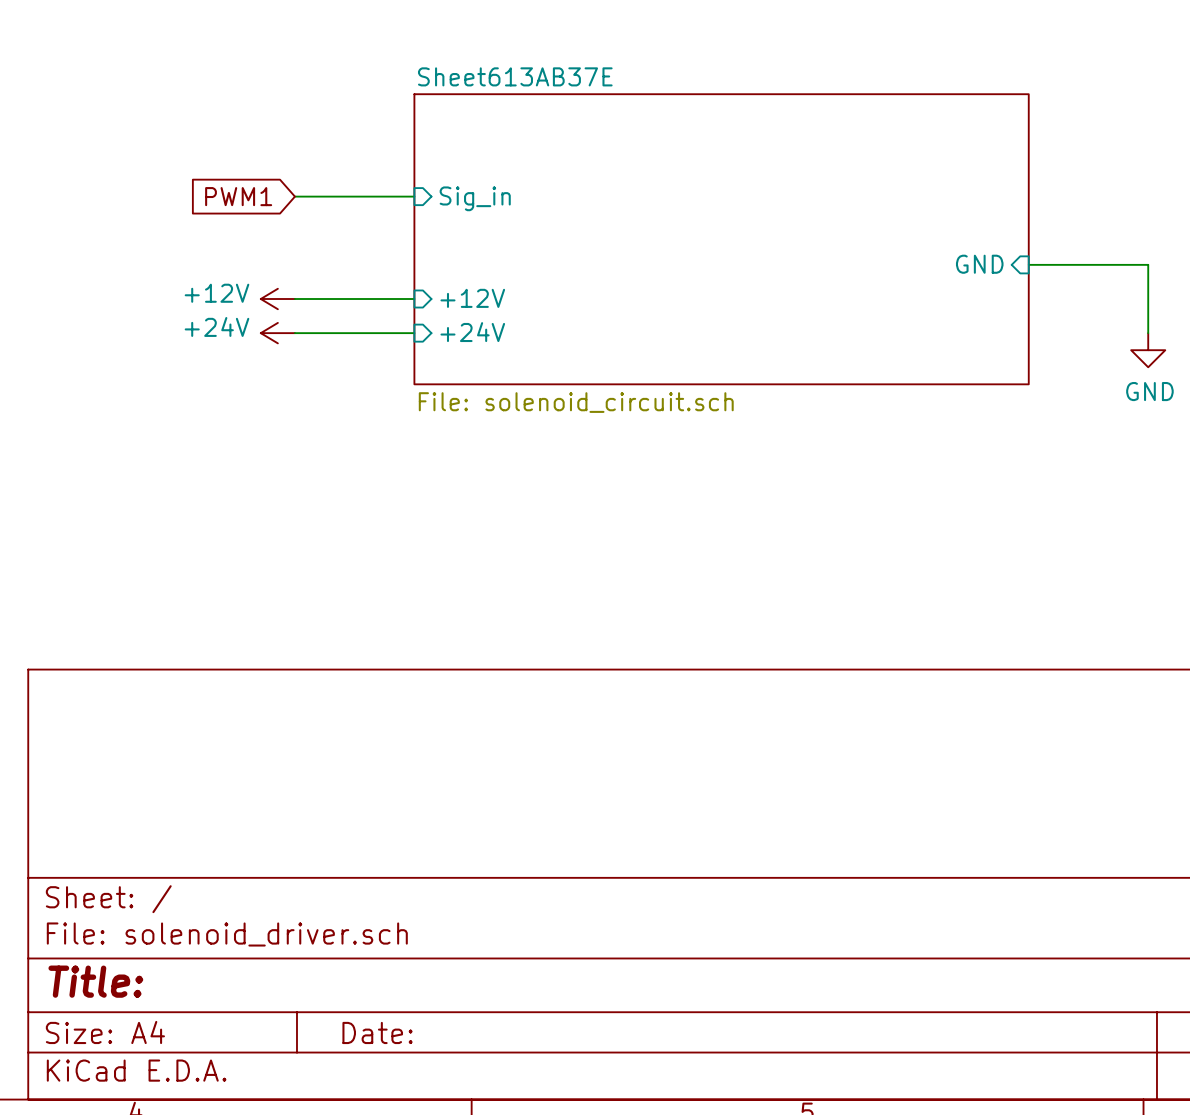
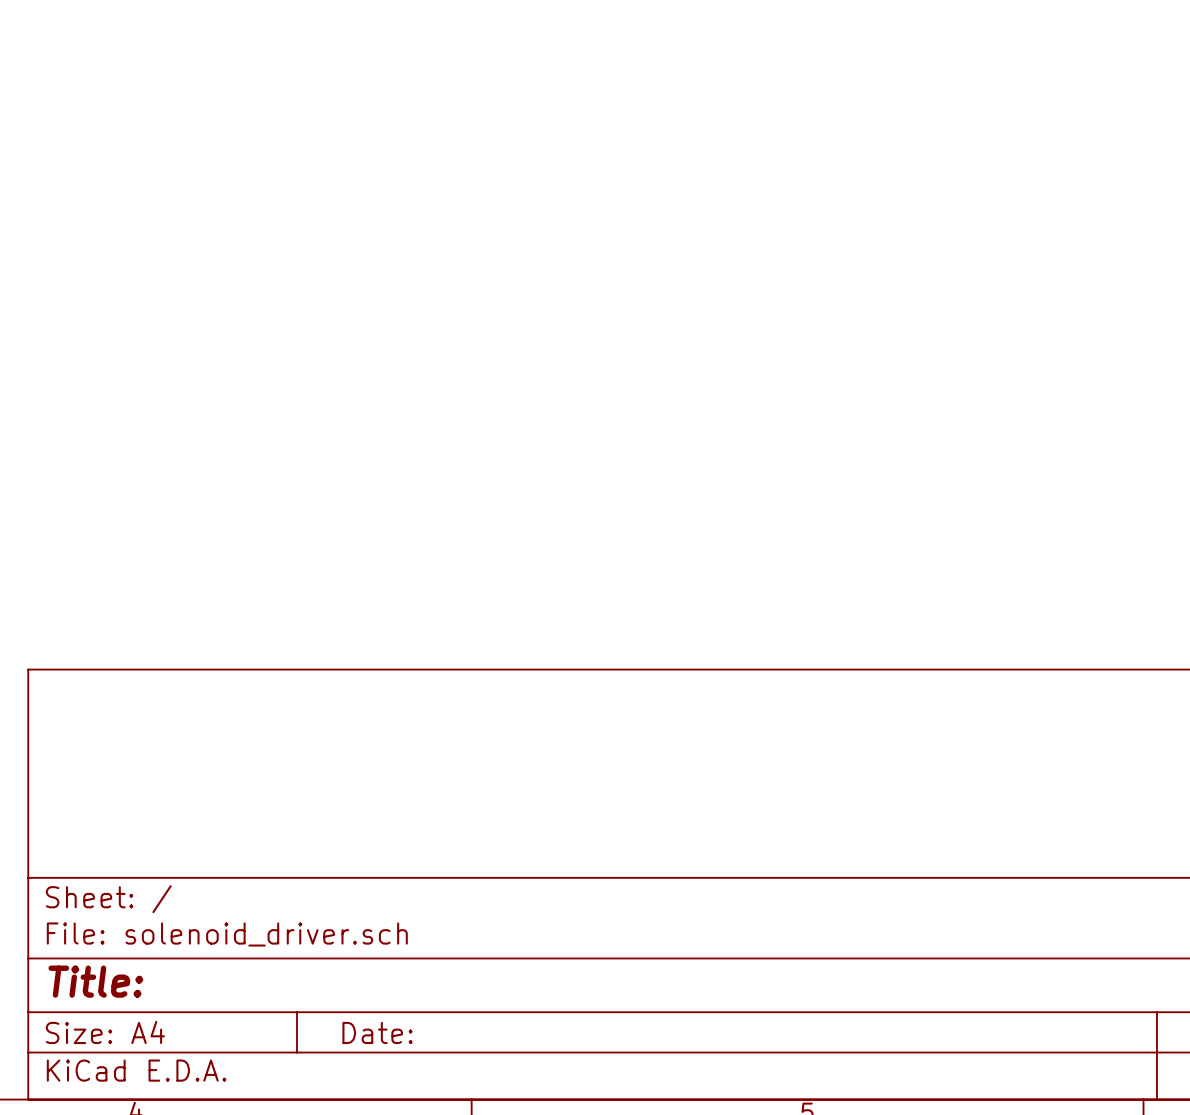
global label: PWM1 (238, 196) -> none
wire: (294, 196) (414, 196) -> none
sheet pin: Sig_in (475, 198) -> none
sheet Sheet613AB37E: File: solenoid_circuit.sch (721, 239) -> none
sheet pin: GND (979, 264) -> none
wire: (1028, 264) (1148, 264) (1148, 333) -> none
sheet pin: +12V (472, 298) -> none
power symbol: +12V (277, 299) -> none
wire: (294, 299) (414, 299) -> none
sheet pin: +24V (472, 332) -> none
power symbol: +24V (277, 333) -> none
wire: (294, 333) (414, 333) -> none
power symbol: GND (1148, 350) -> none

